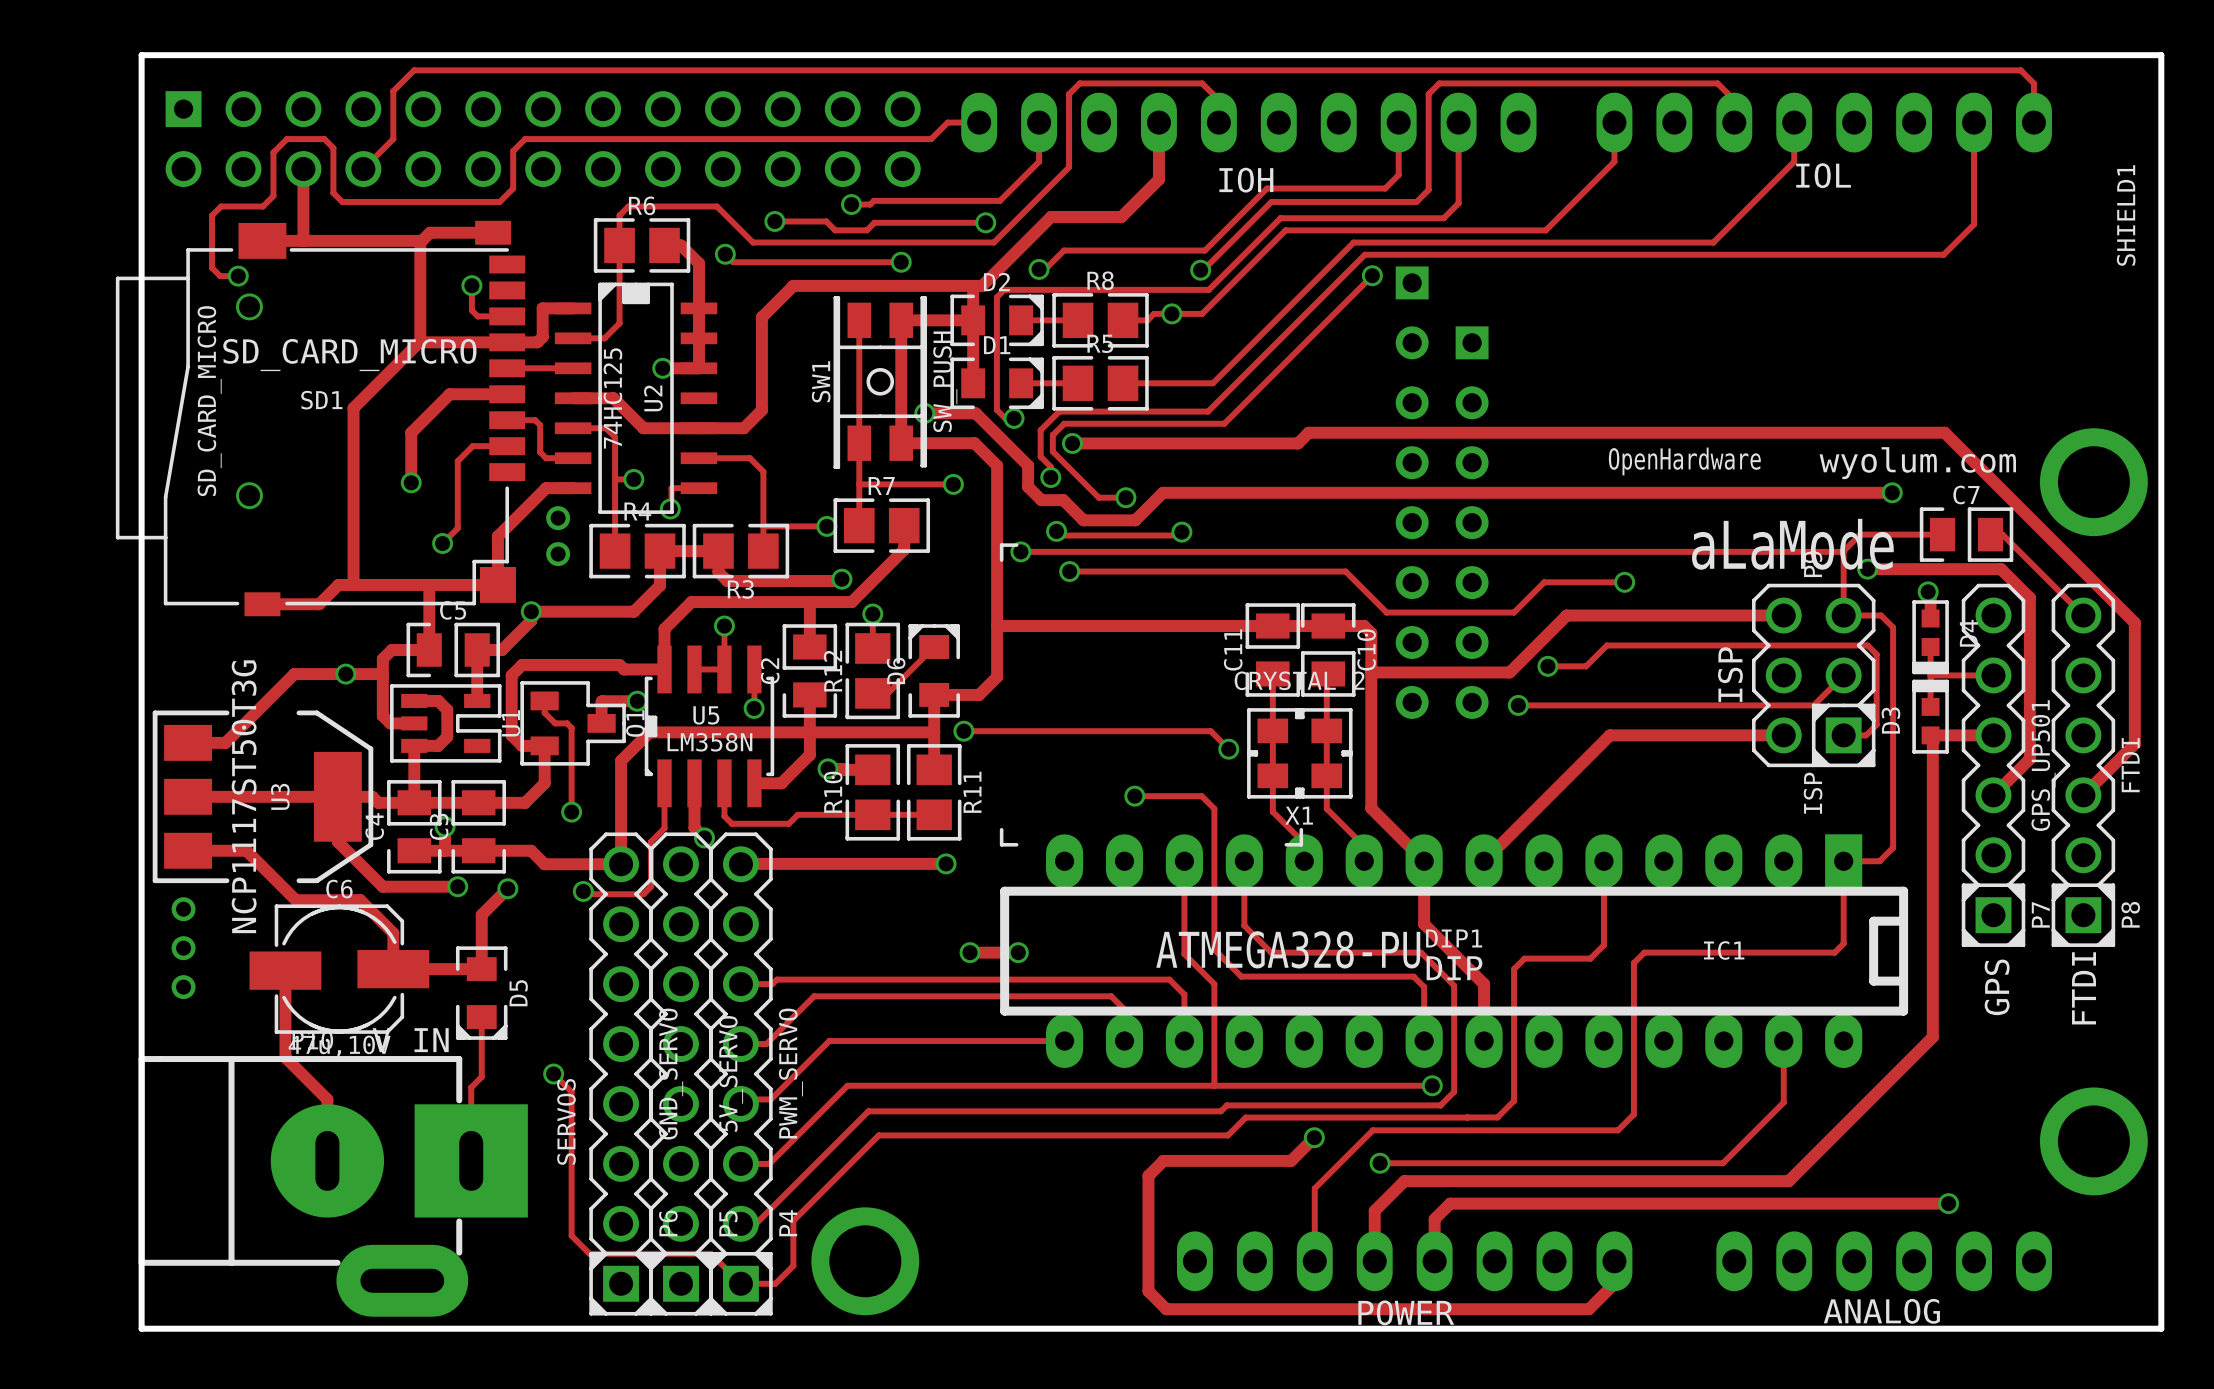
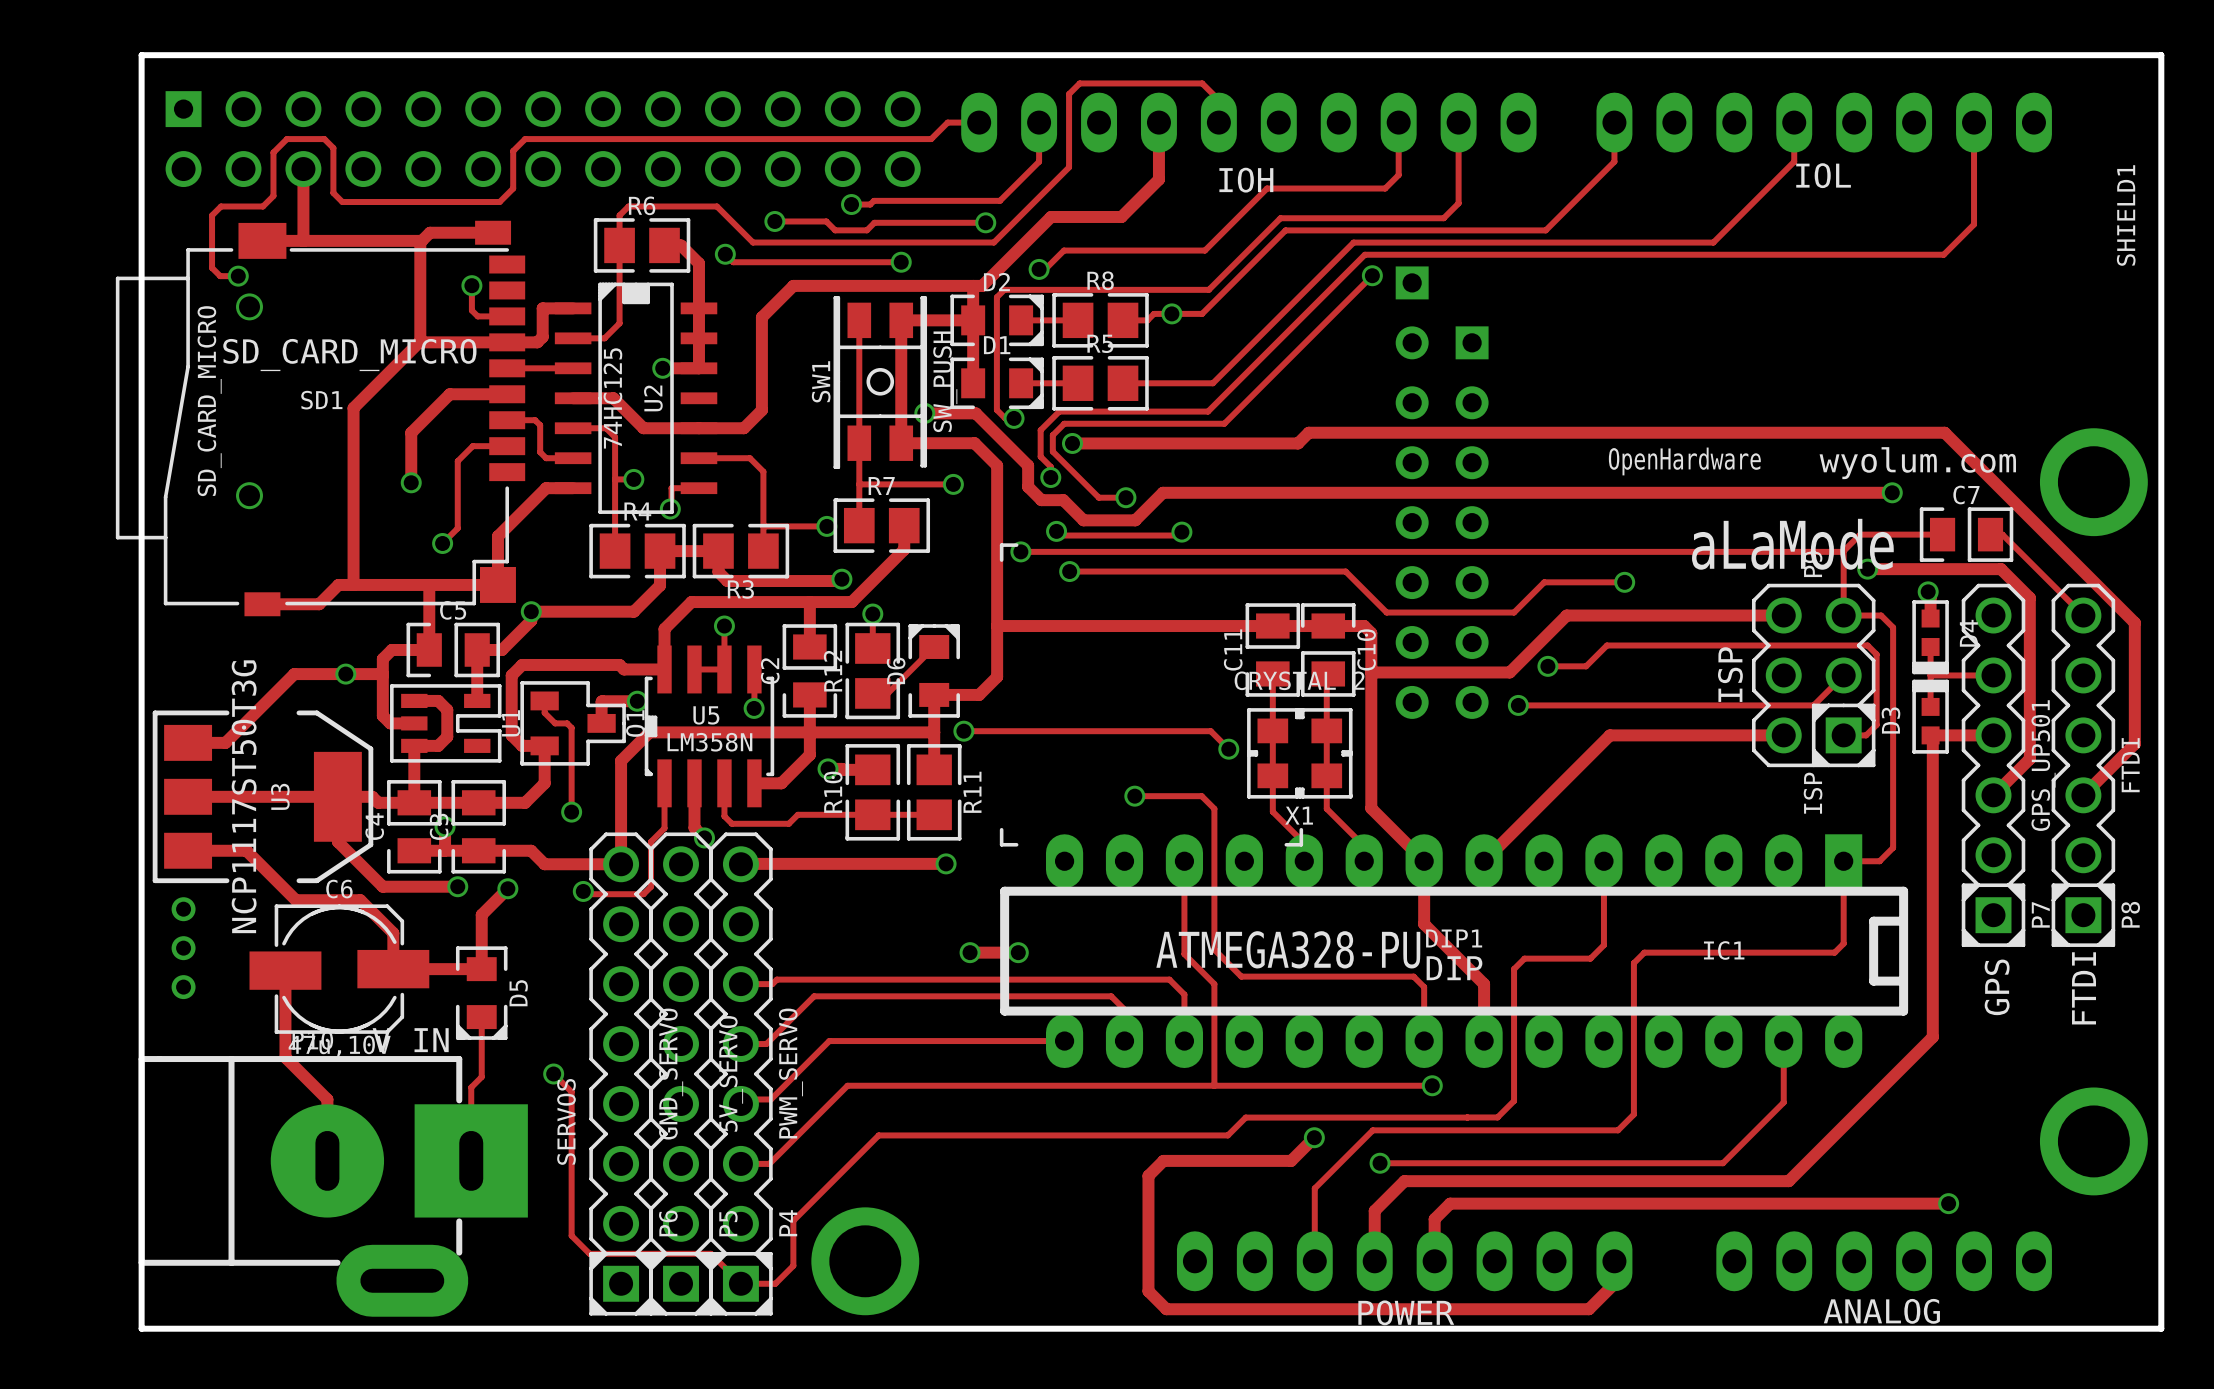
track: (1734, 122) (1734, 100) (1717, 83) (1439, 83) (1428, 94) (1428, 189) (1416, 202) (1271, 202) (1203, 270) (1200, 270) -> none
track: (2033, 122) (2033, 83) (2020, 70) (414, 70) (393, 91) (393, 139) (363, 169) -> none
via: (1200, 270) -> none
part: (558, 518) -> none
part: (558, 554) -> none
track: (1244, 861) (1244, 925) (1271, 952) (1421, 952) (1454, 985) (1454, 1091) (1440, 1105) (1226, 1105) (1220, 1111) (868, 1111) (755, 1223) (740, 1223) -> none

